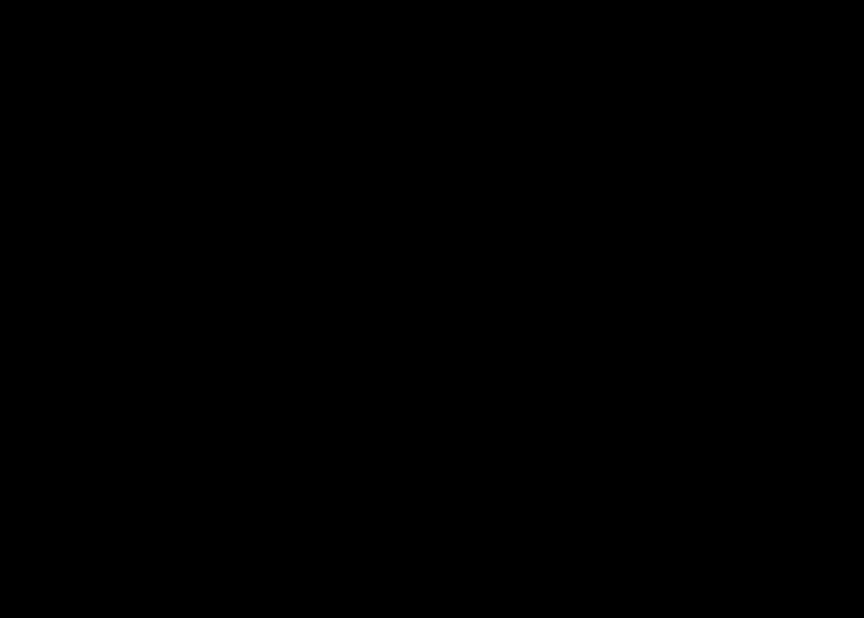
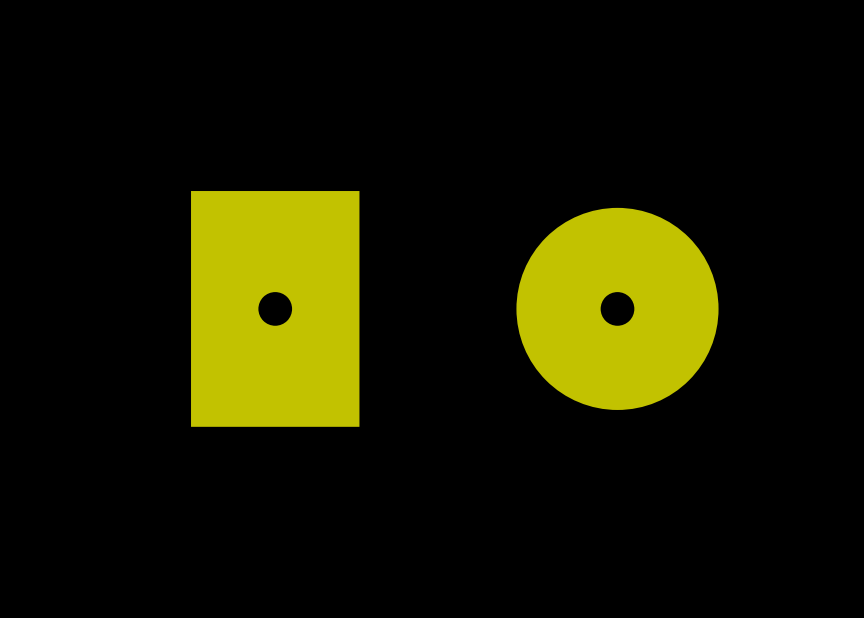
part: none -> (275, 308)
part: none -> (617, 308)

